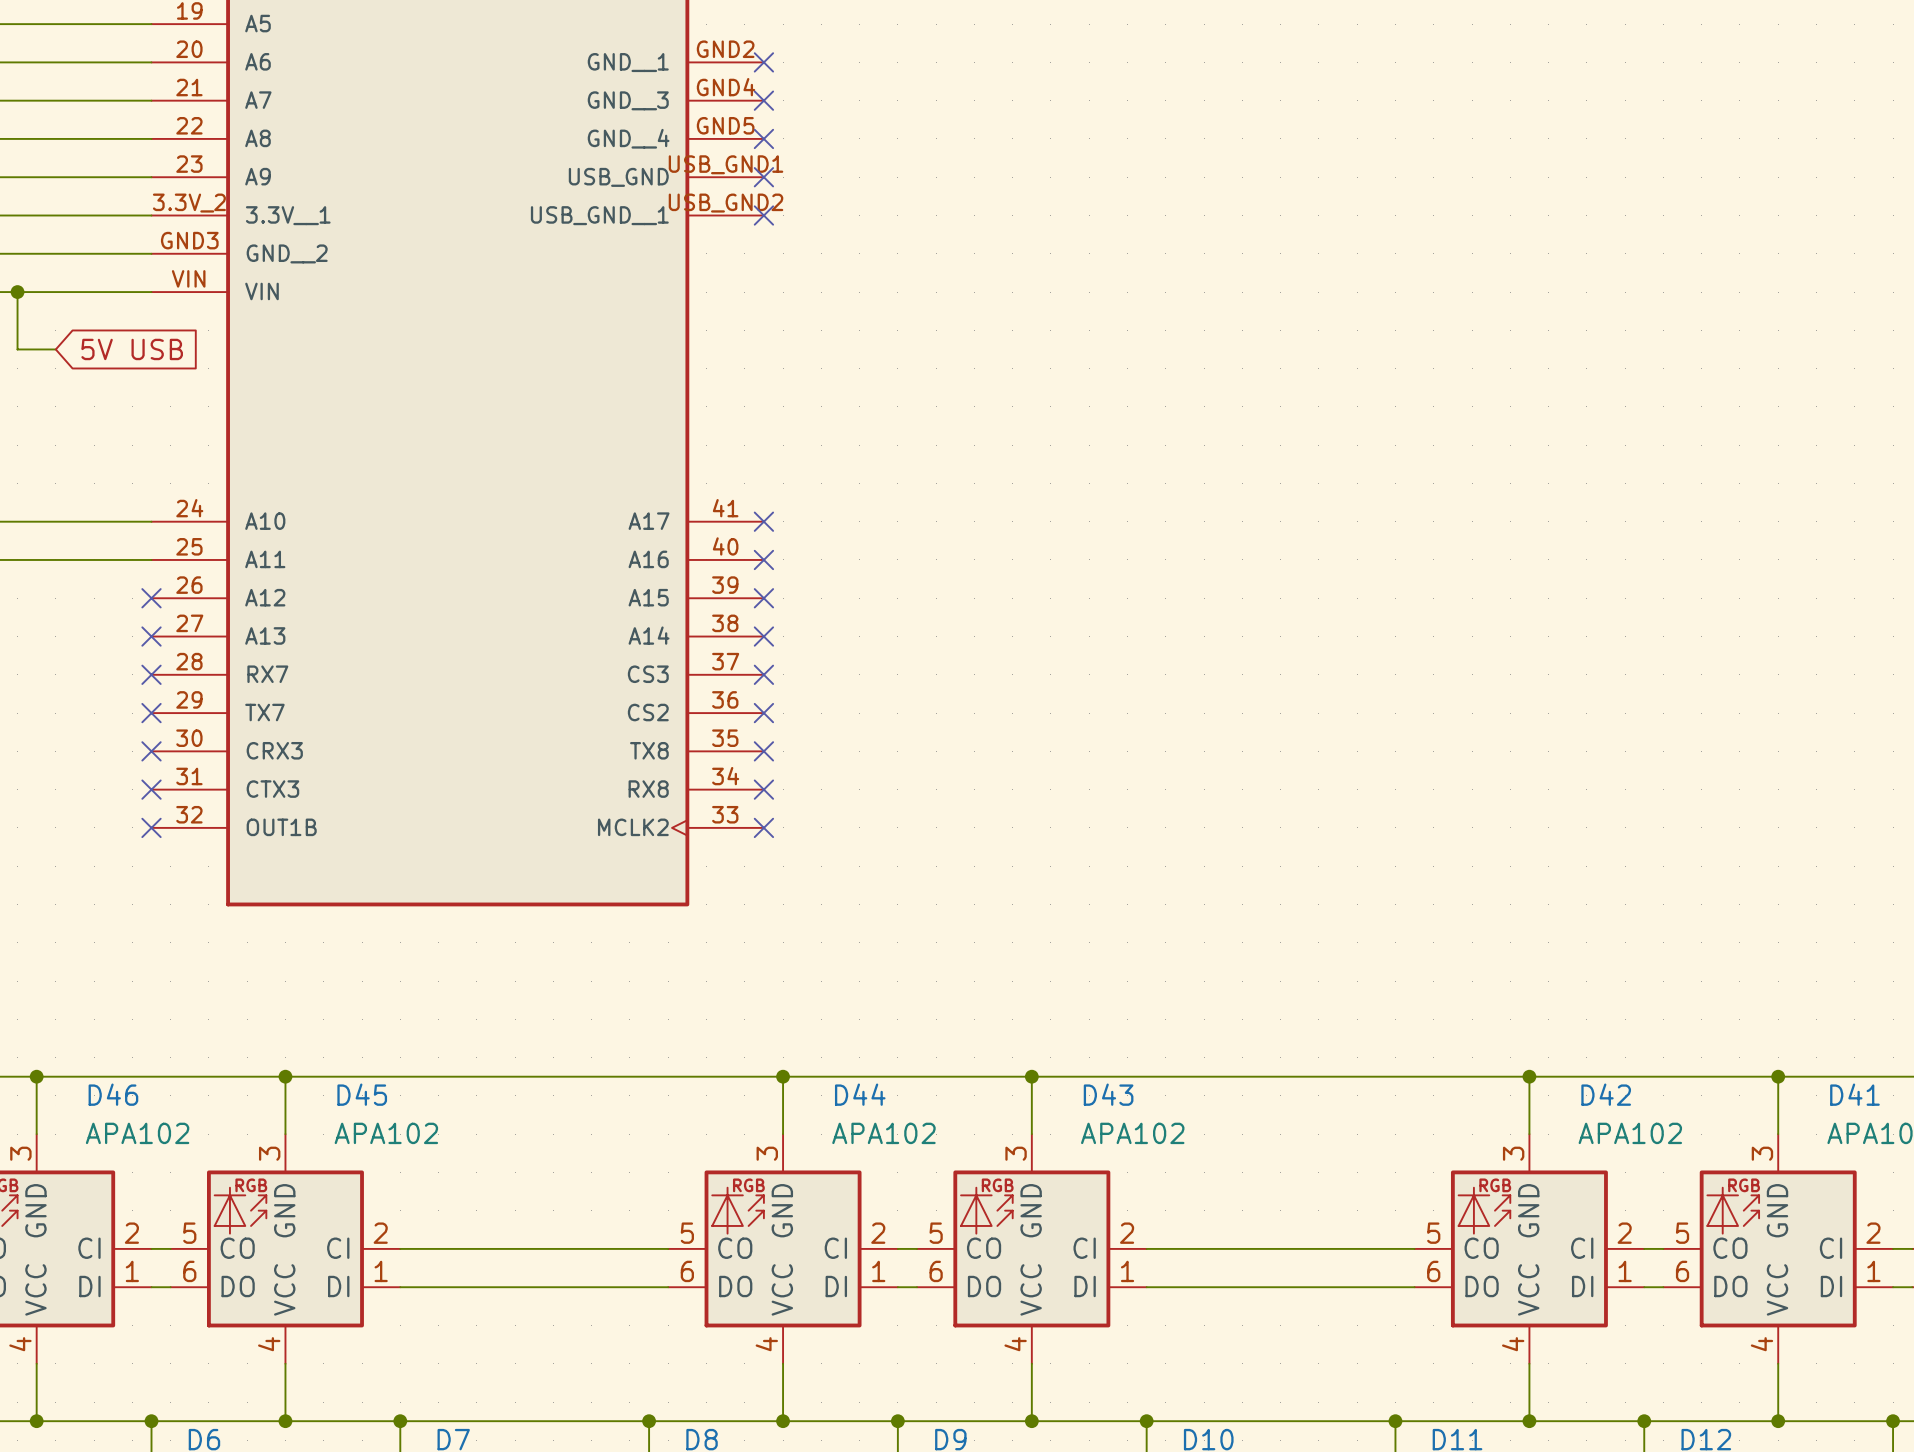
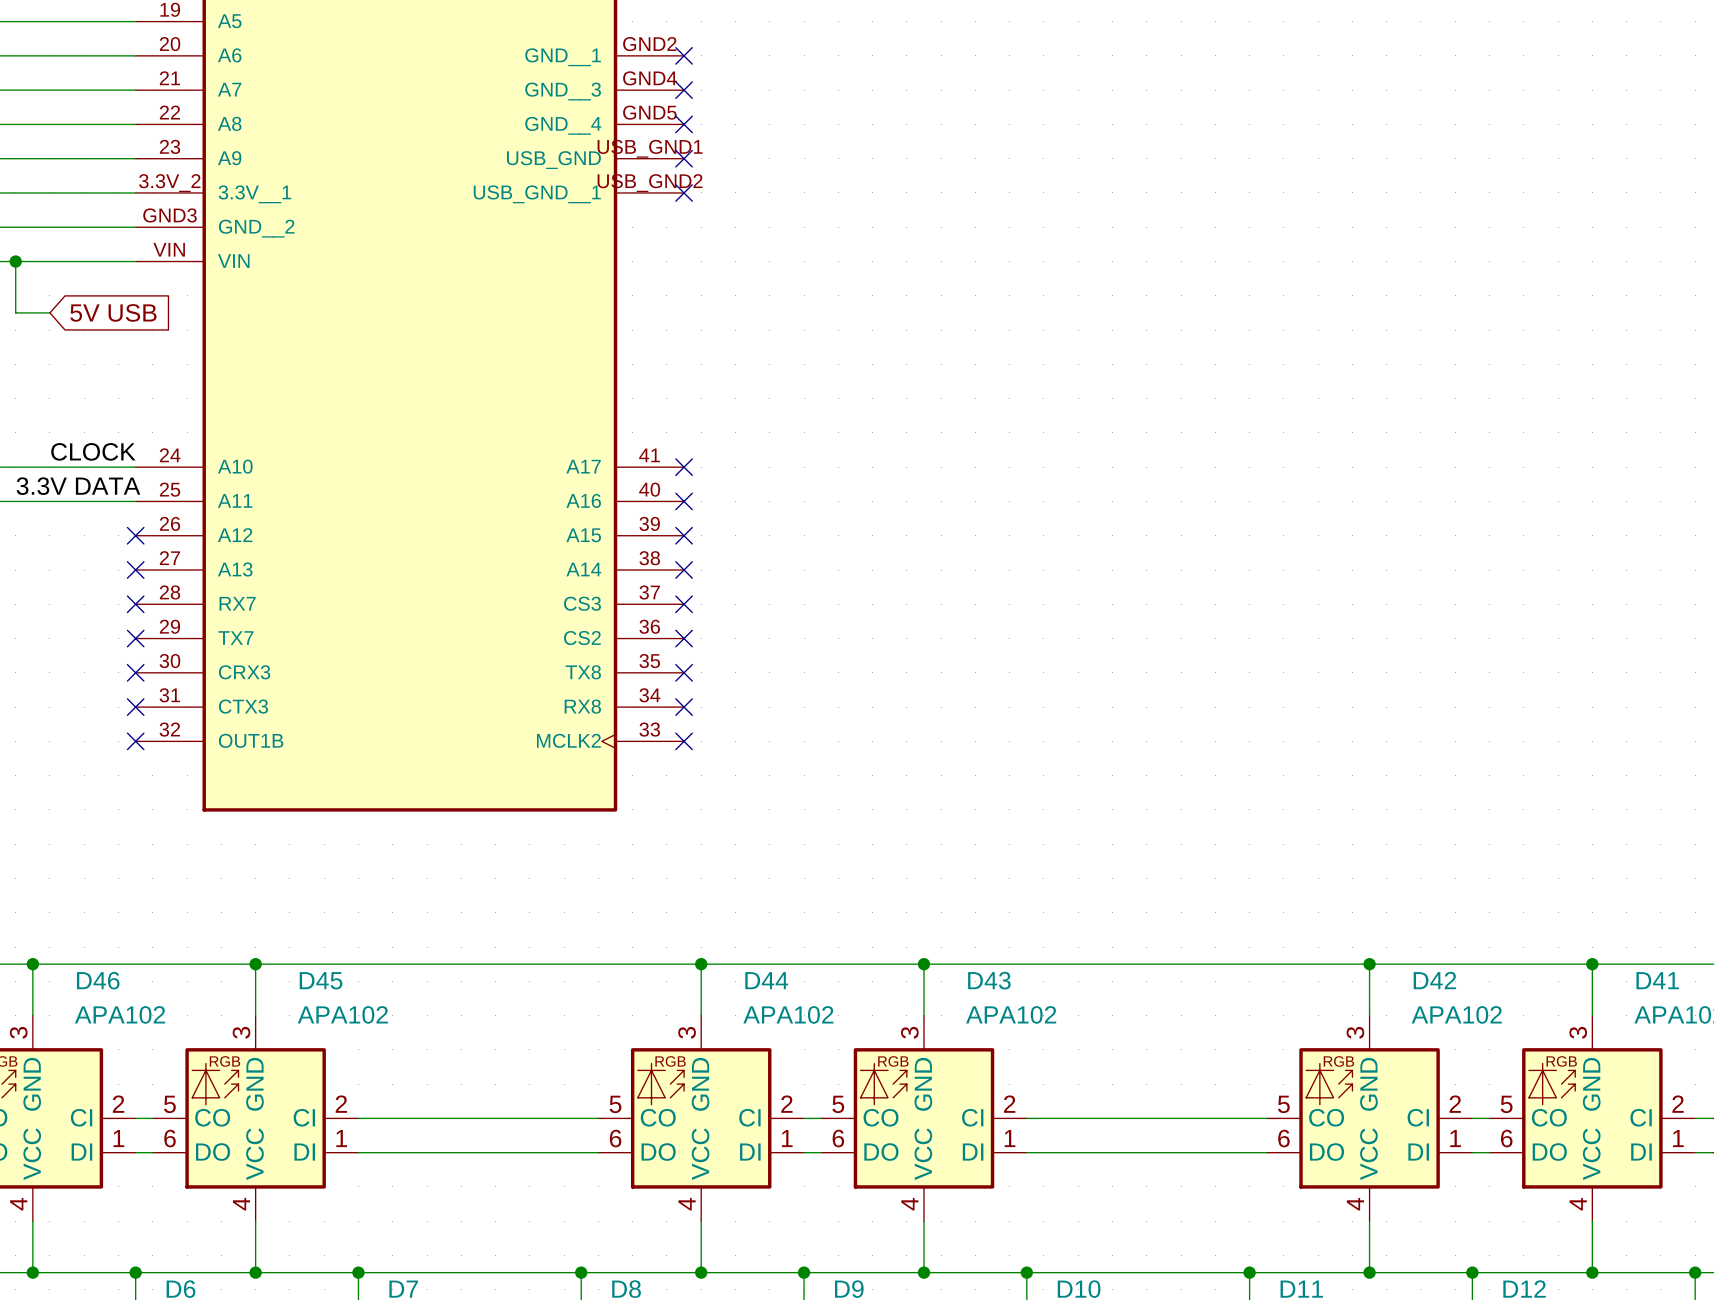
label: none -> CLOCK (93, 451)
label: none -> 3.3V DATA (78, 486)

